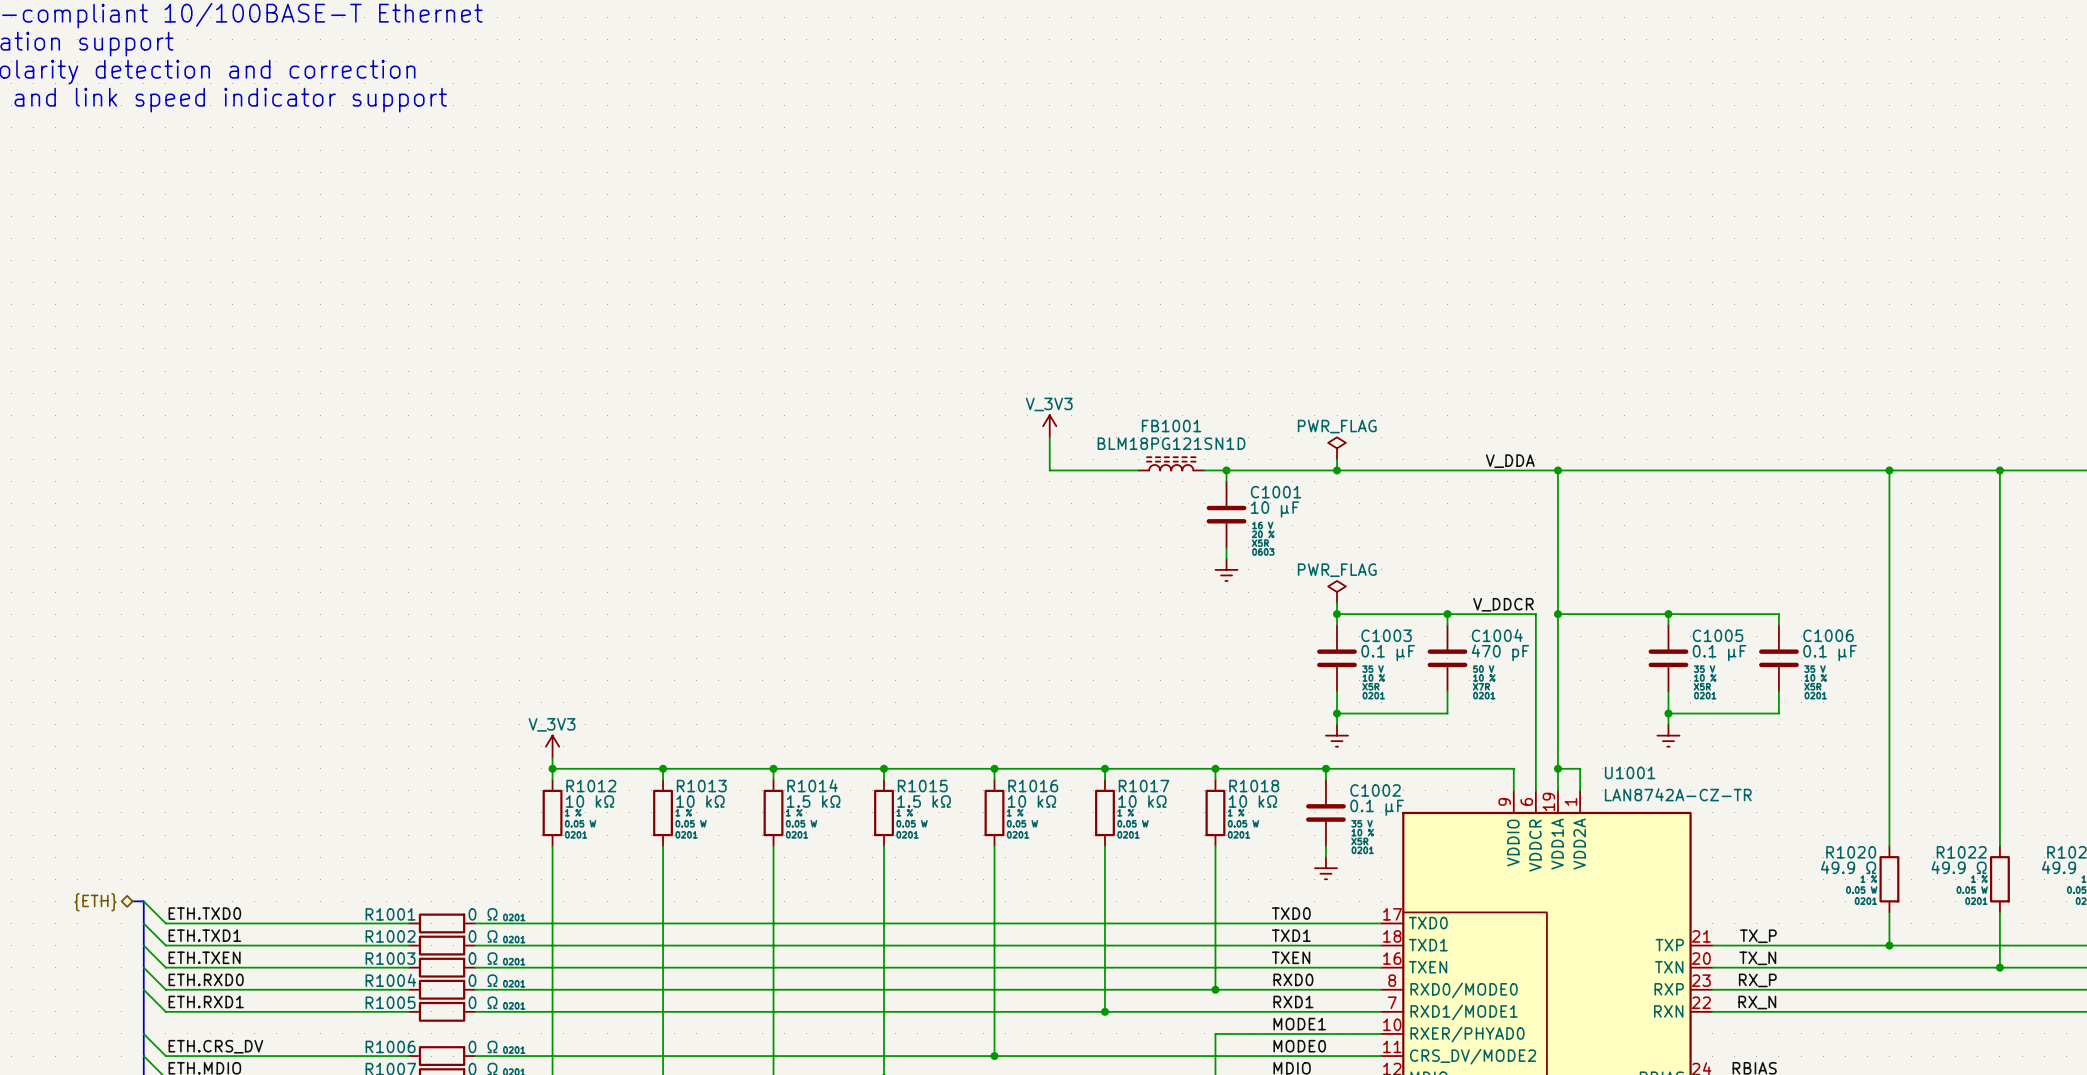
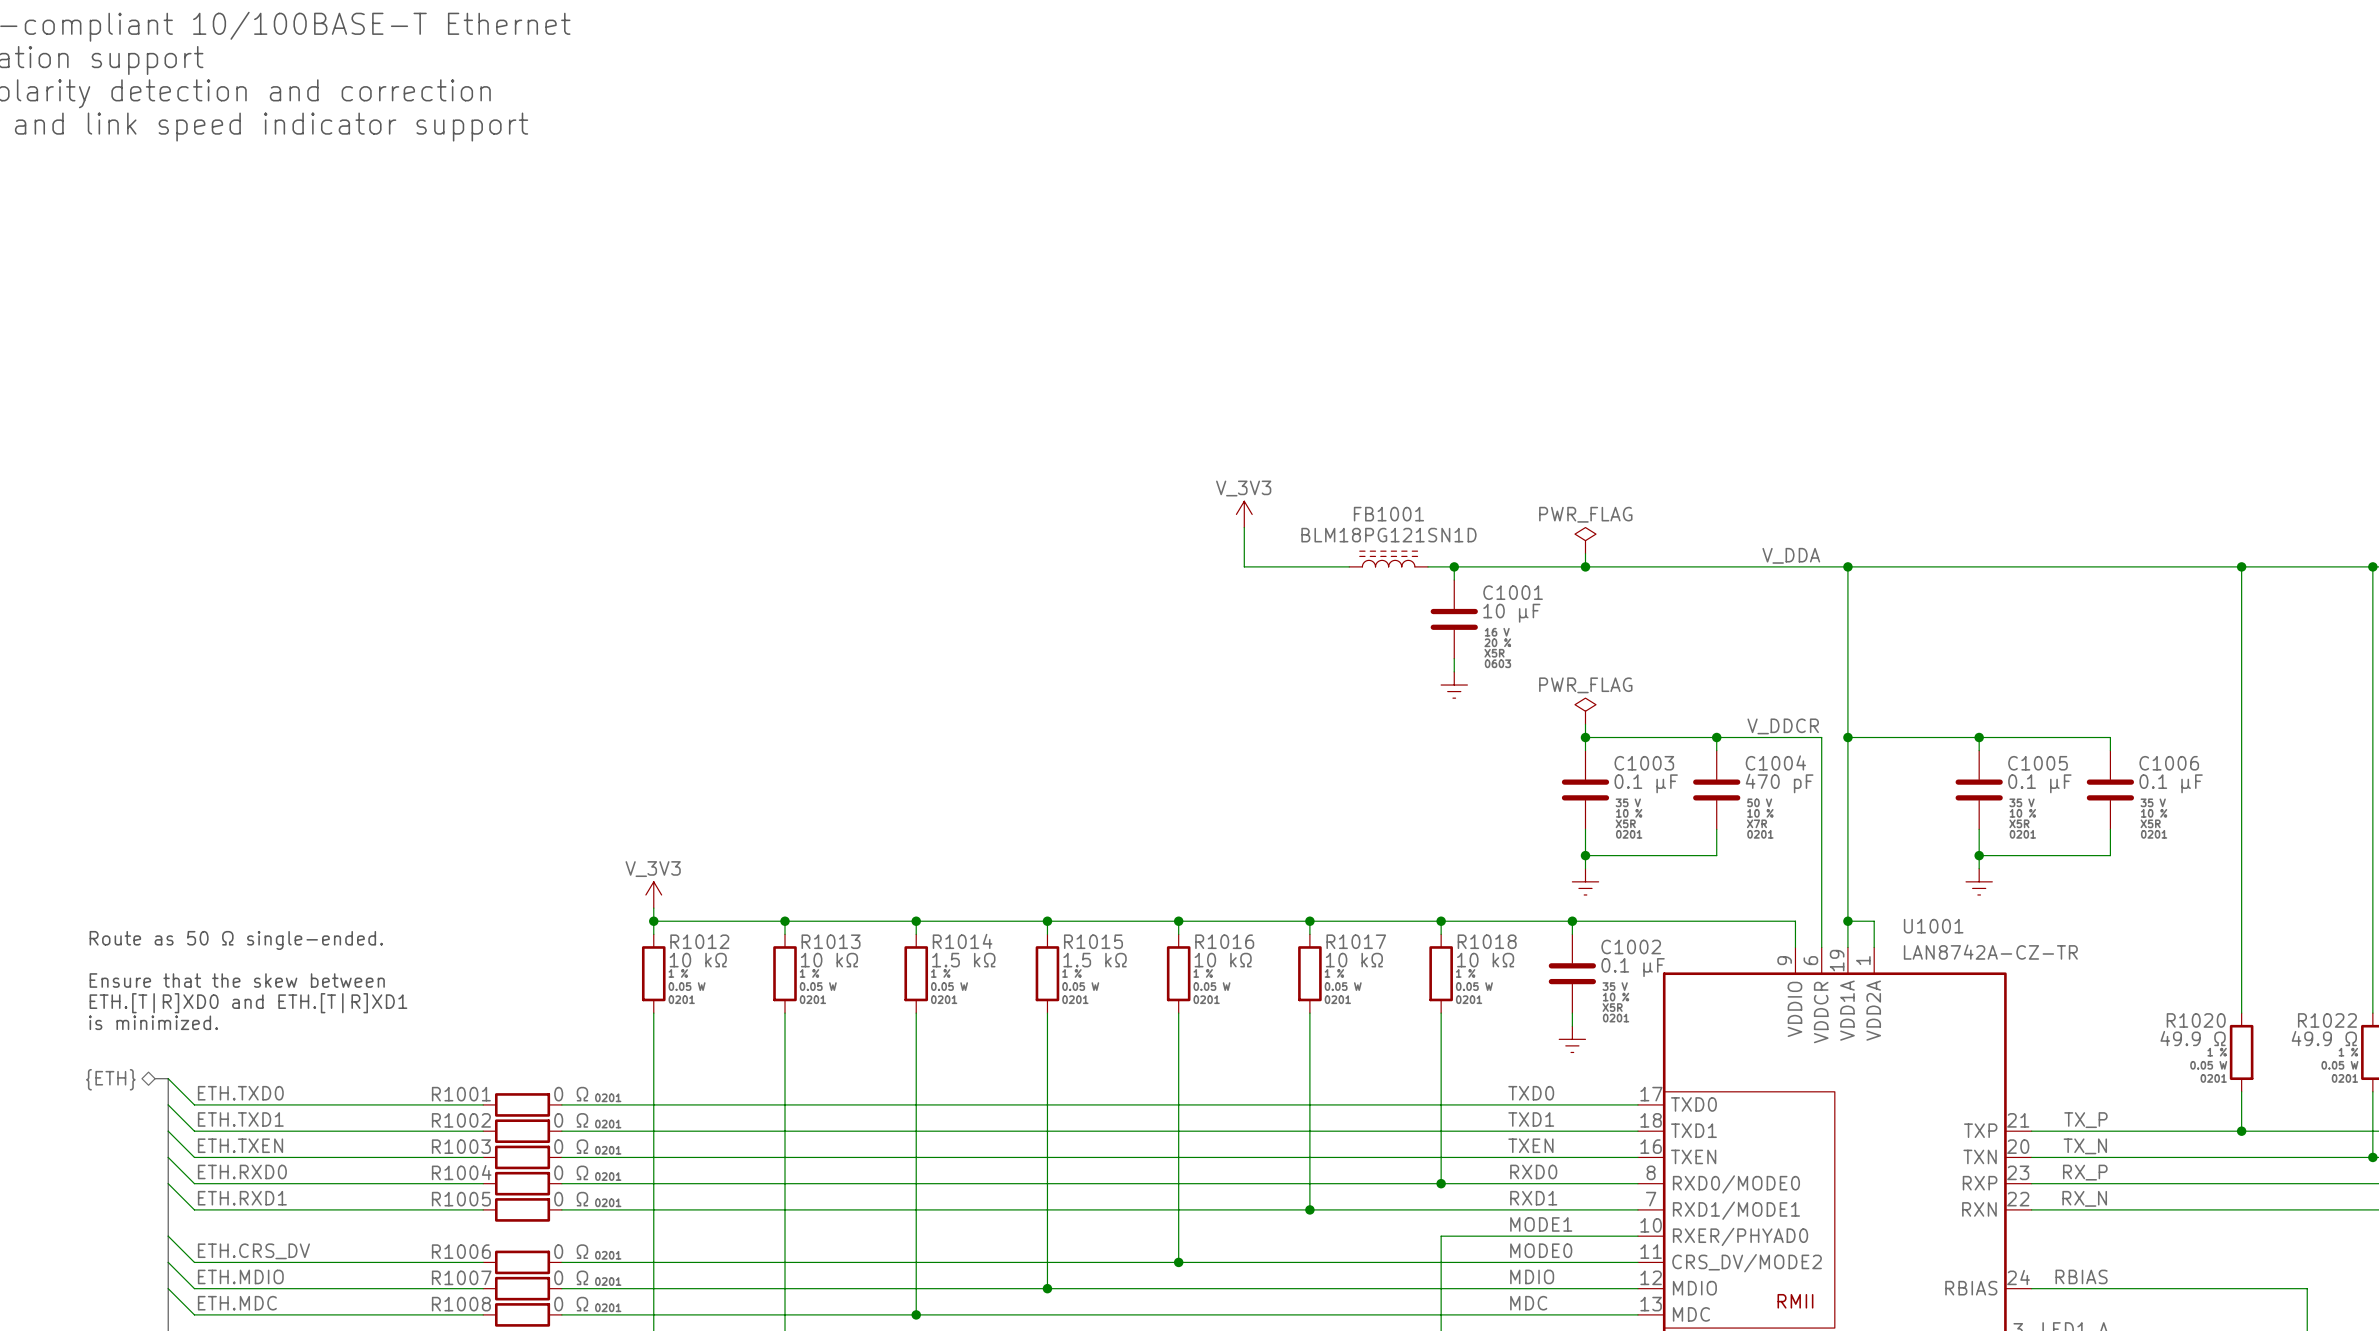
text: none -> Route as 50 Ω single-ended. (236, 940)
text: none -> Ensure that the skew between (237, 980)
text: none -> ETH.[T|R]XD0 and ETH.[T|R]XD1 (248, 1003)
text: none -> is minimized. (153, 1022)

